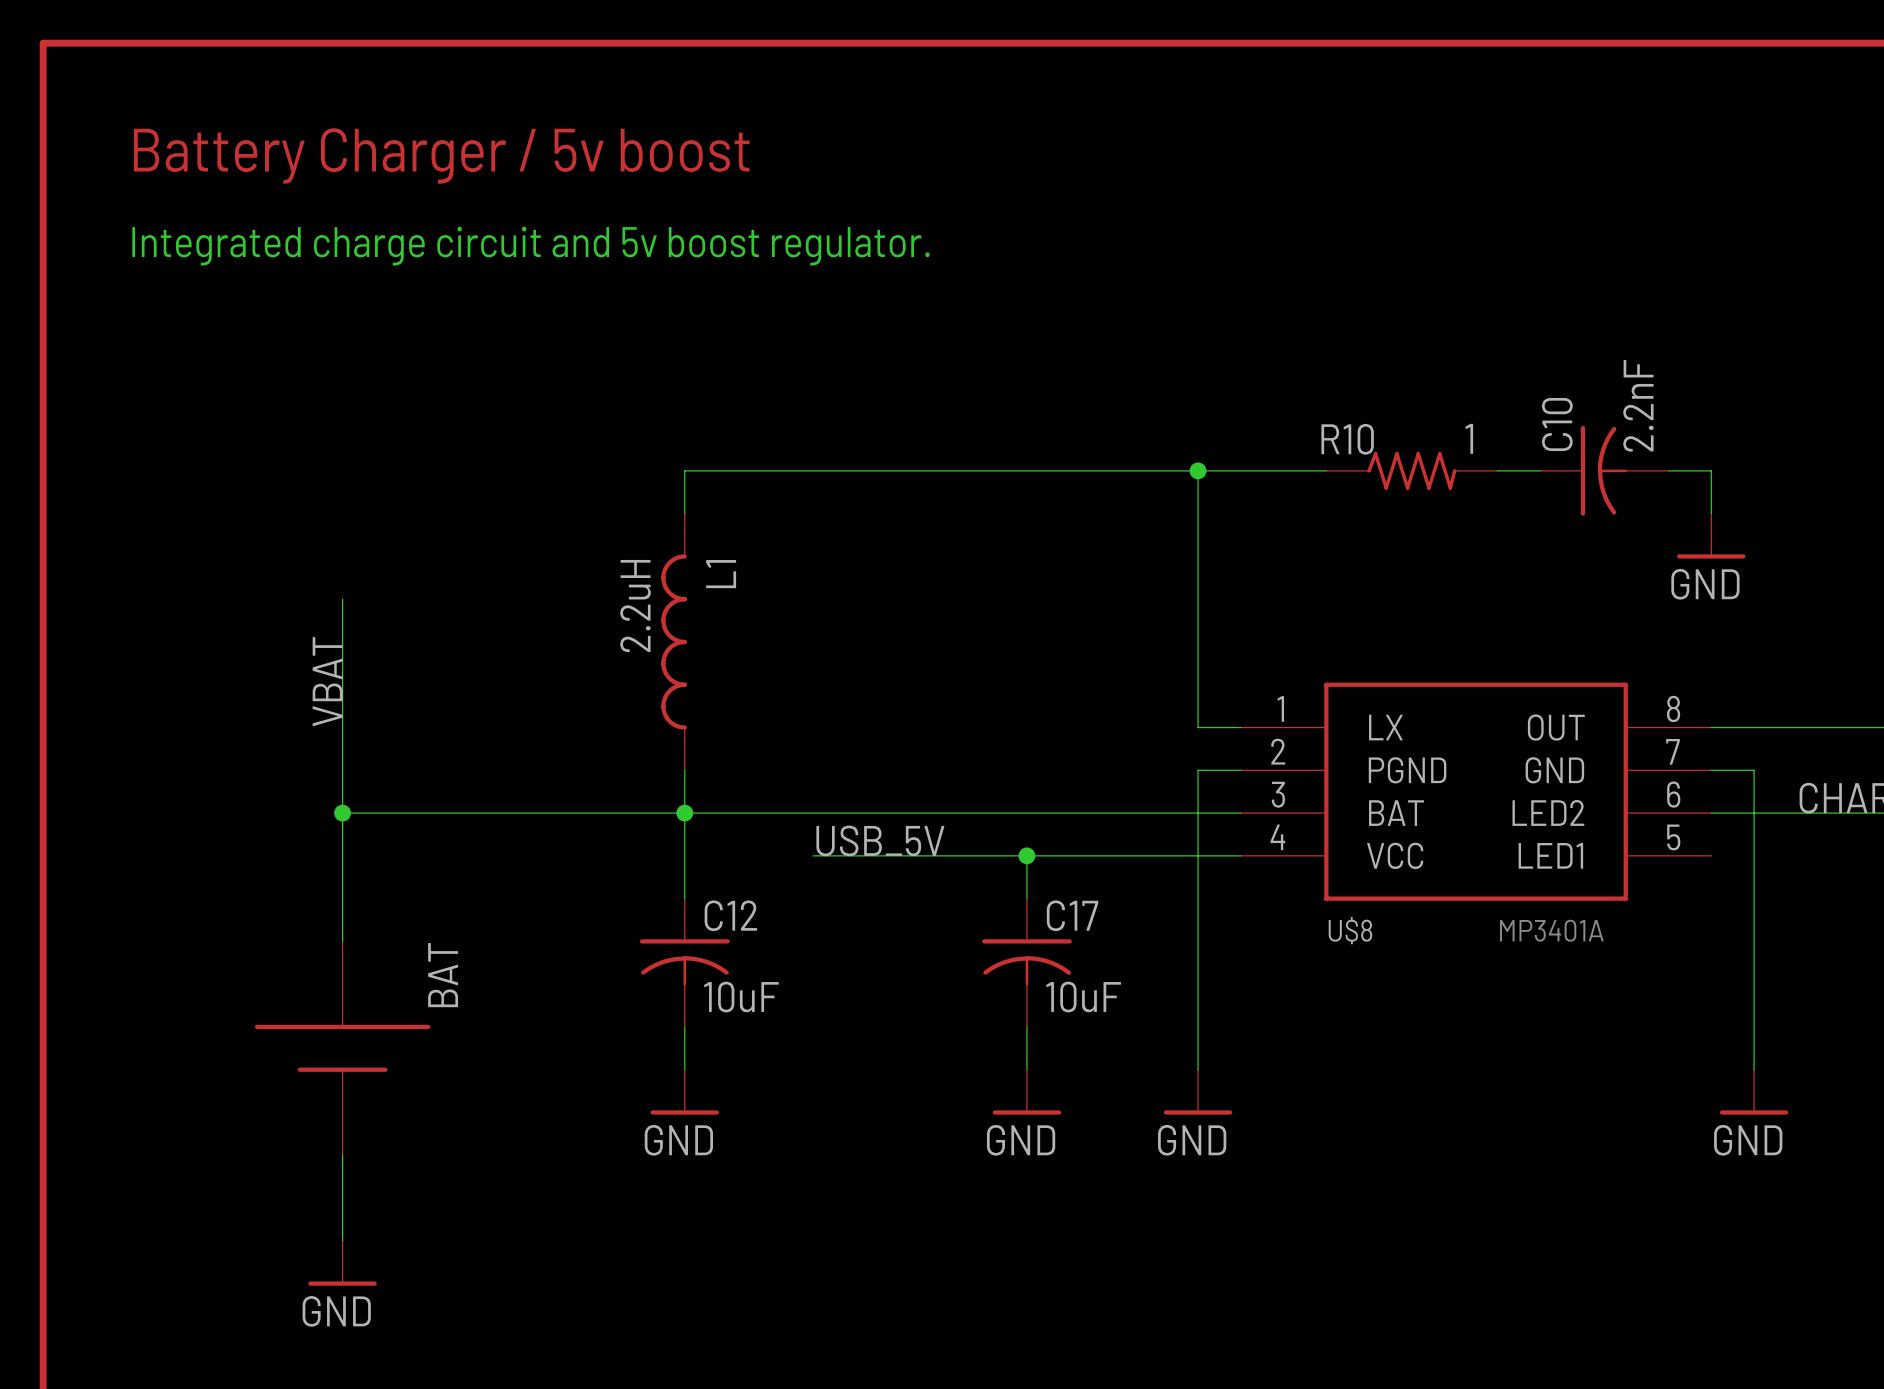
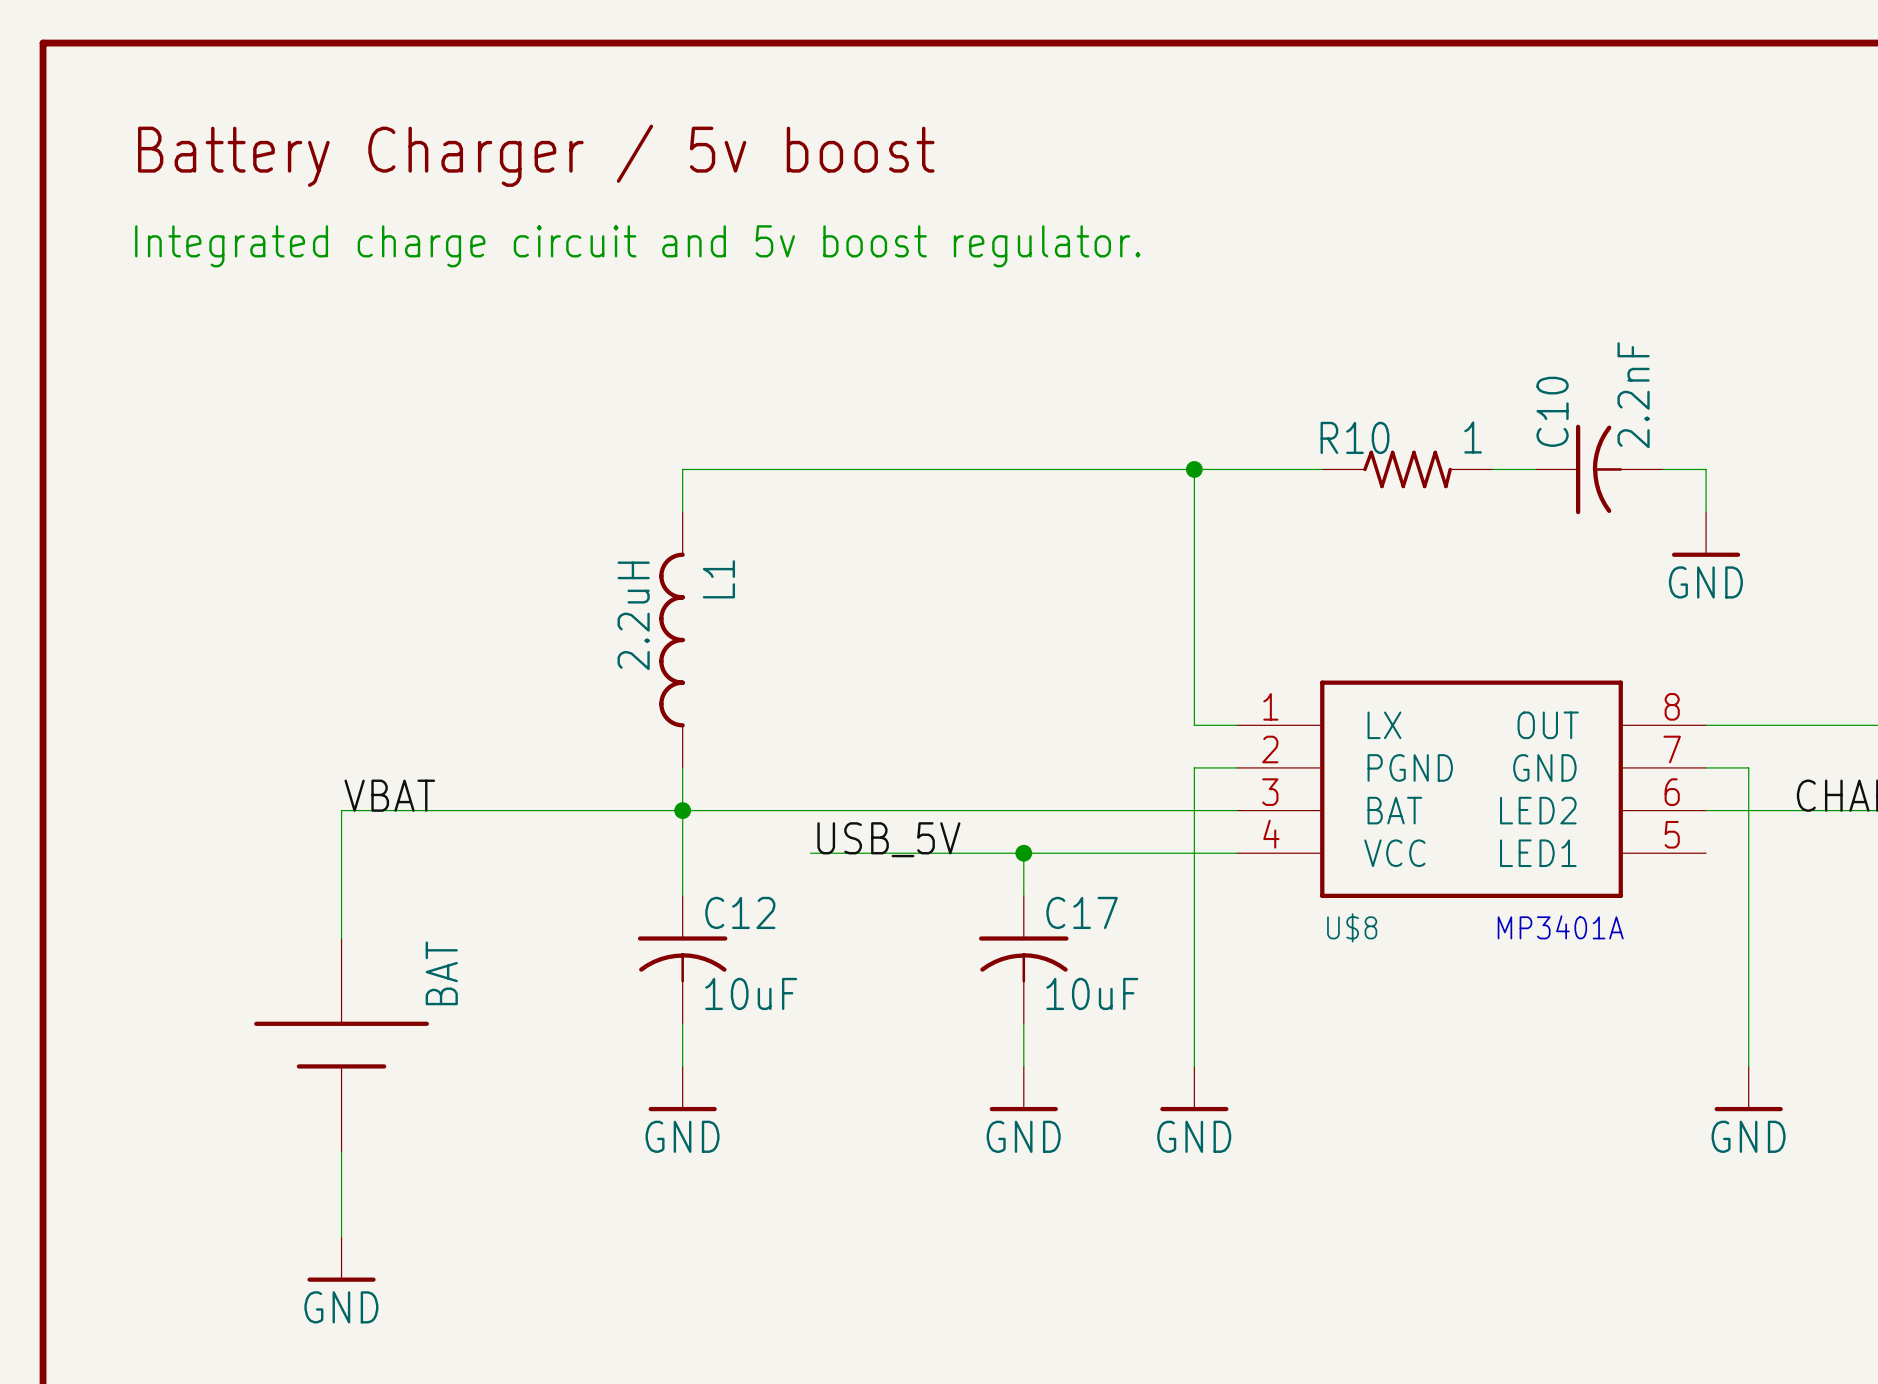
wire: (342, 599) (342, 813) -> none
label rotation: 0° (327, 681) -> 90° clockwise (389, 795)
label position: VBAT (327, 681) -> VBAT (389, 795)
junction: (342, 813) -> none

